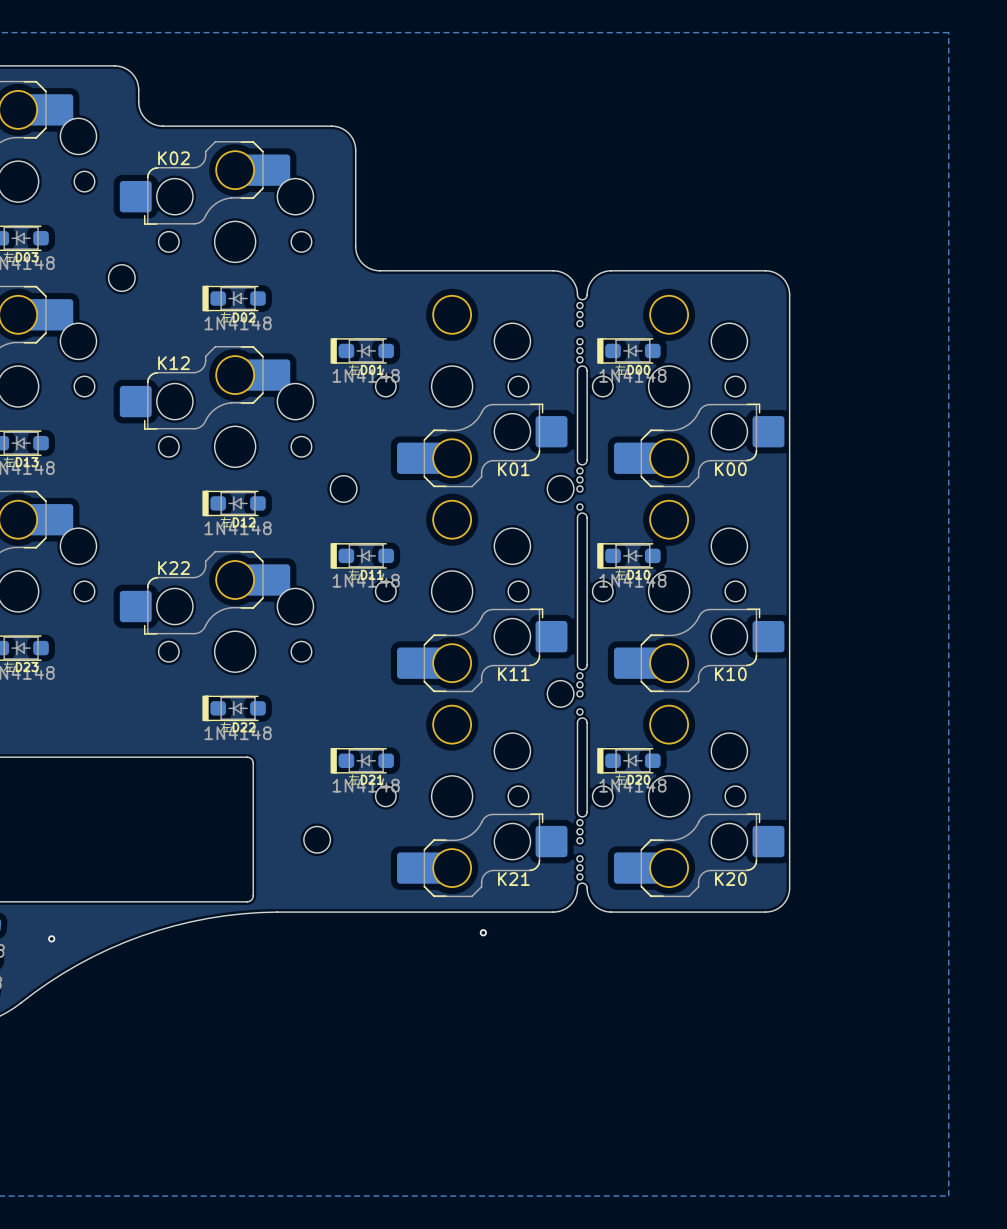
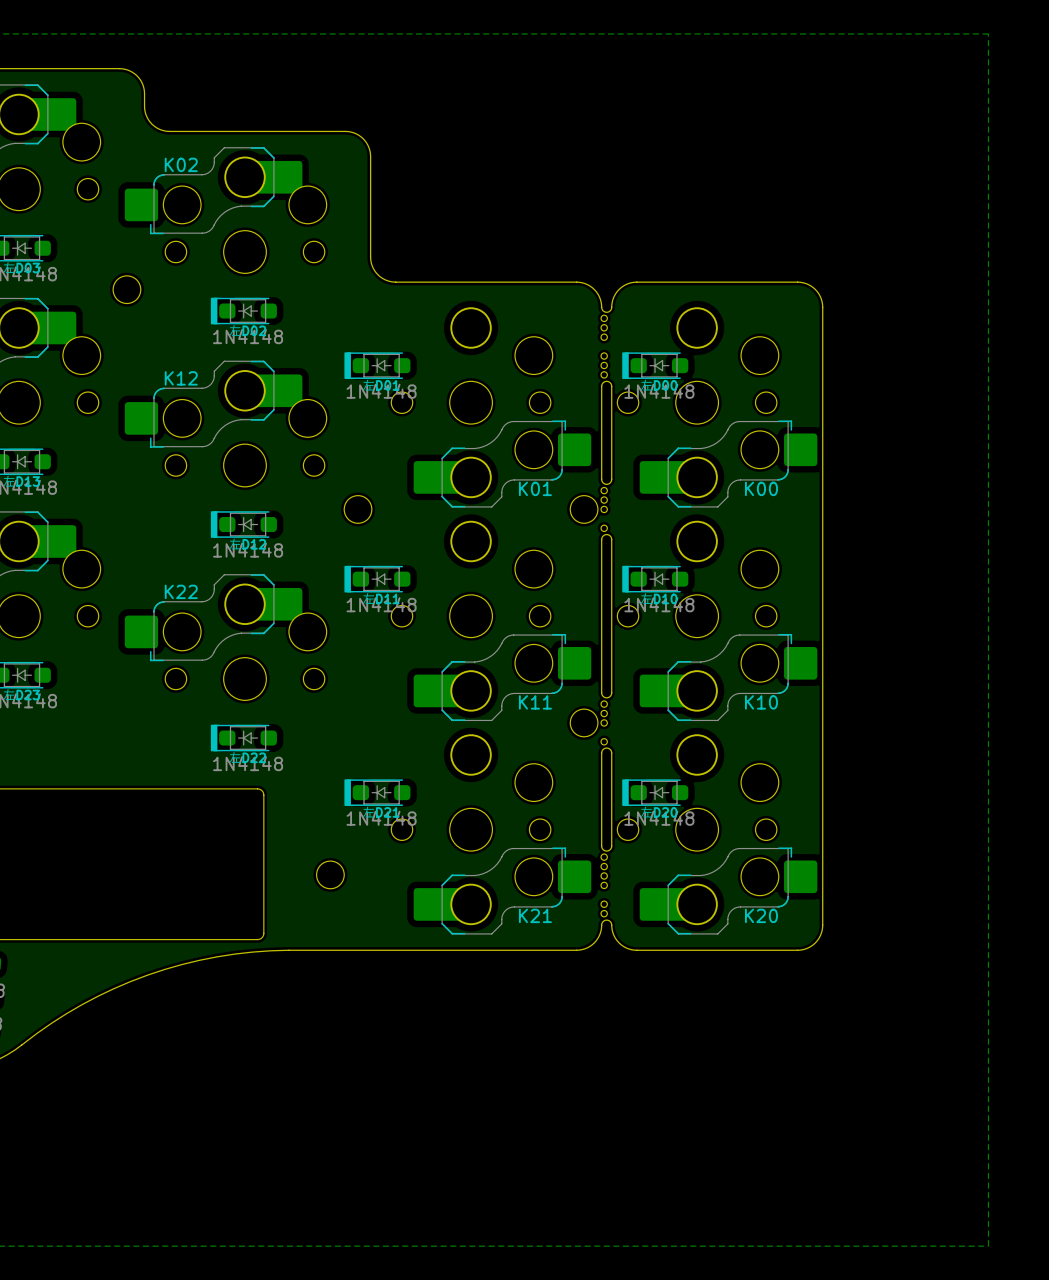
part footprint: [576, 819, 583, 880] -> [601, 854, 608, 917]
via: (483, 932) -> none
via: (51, 938) -> none

